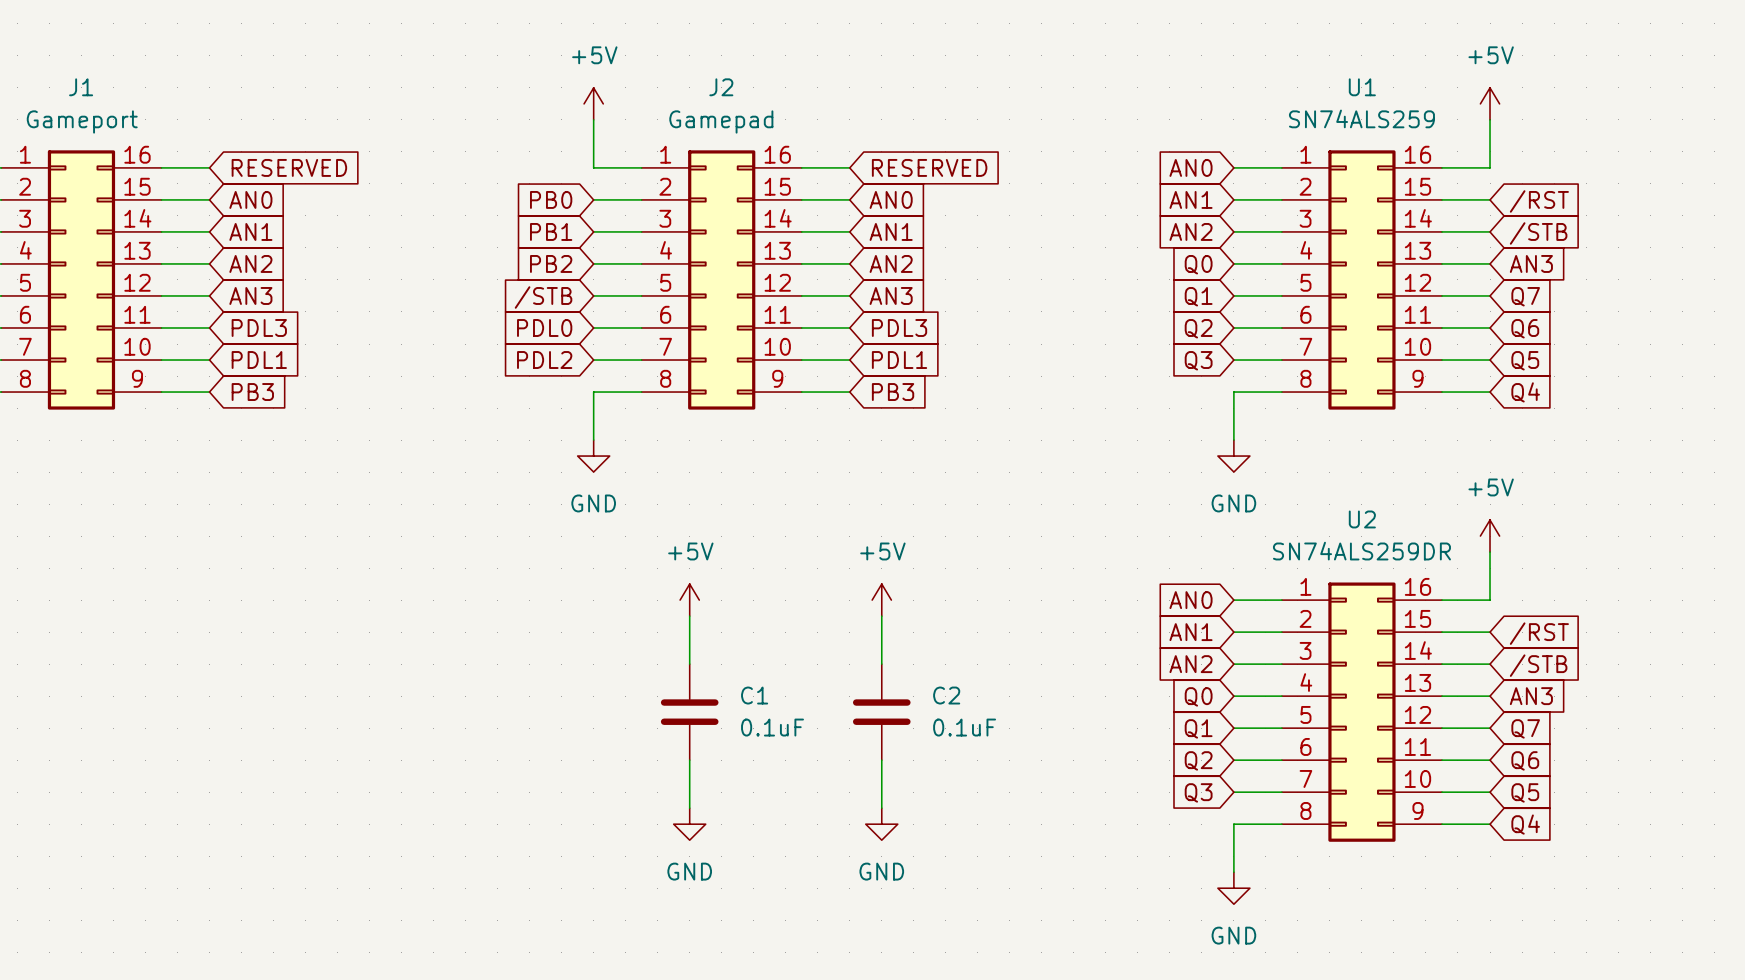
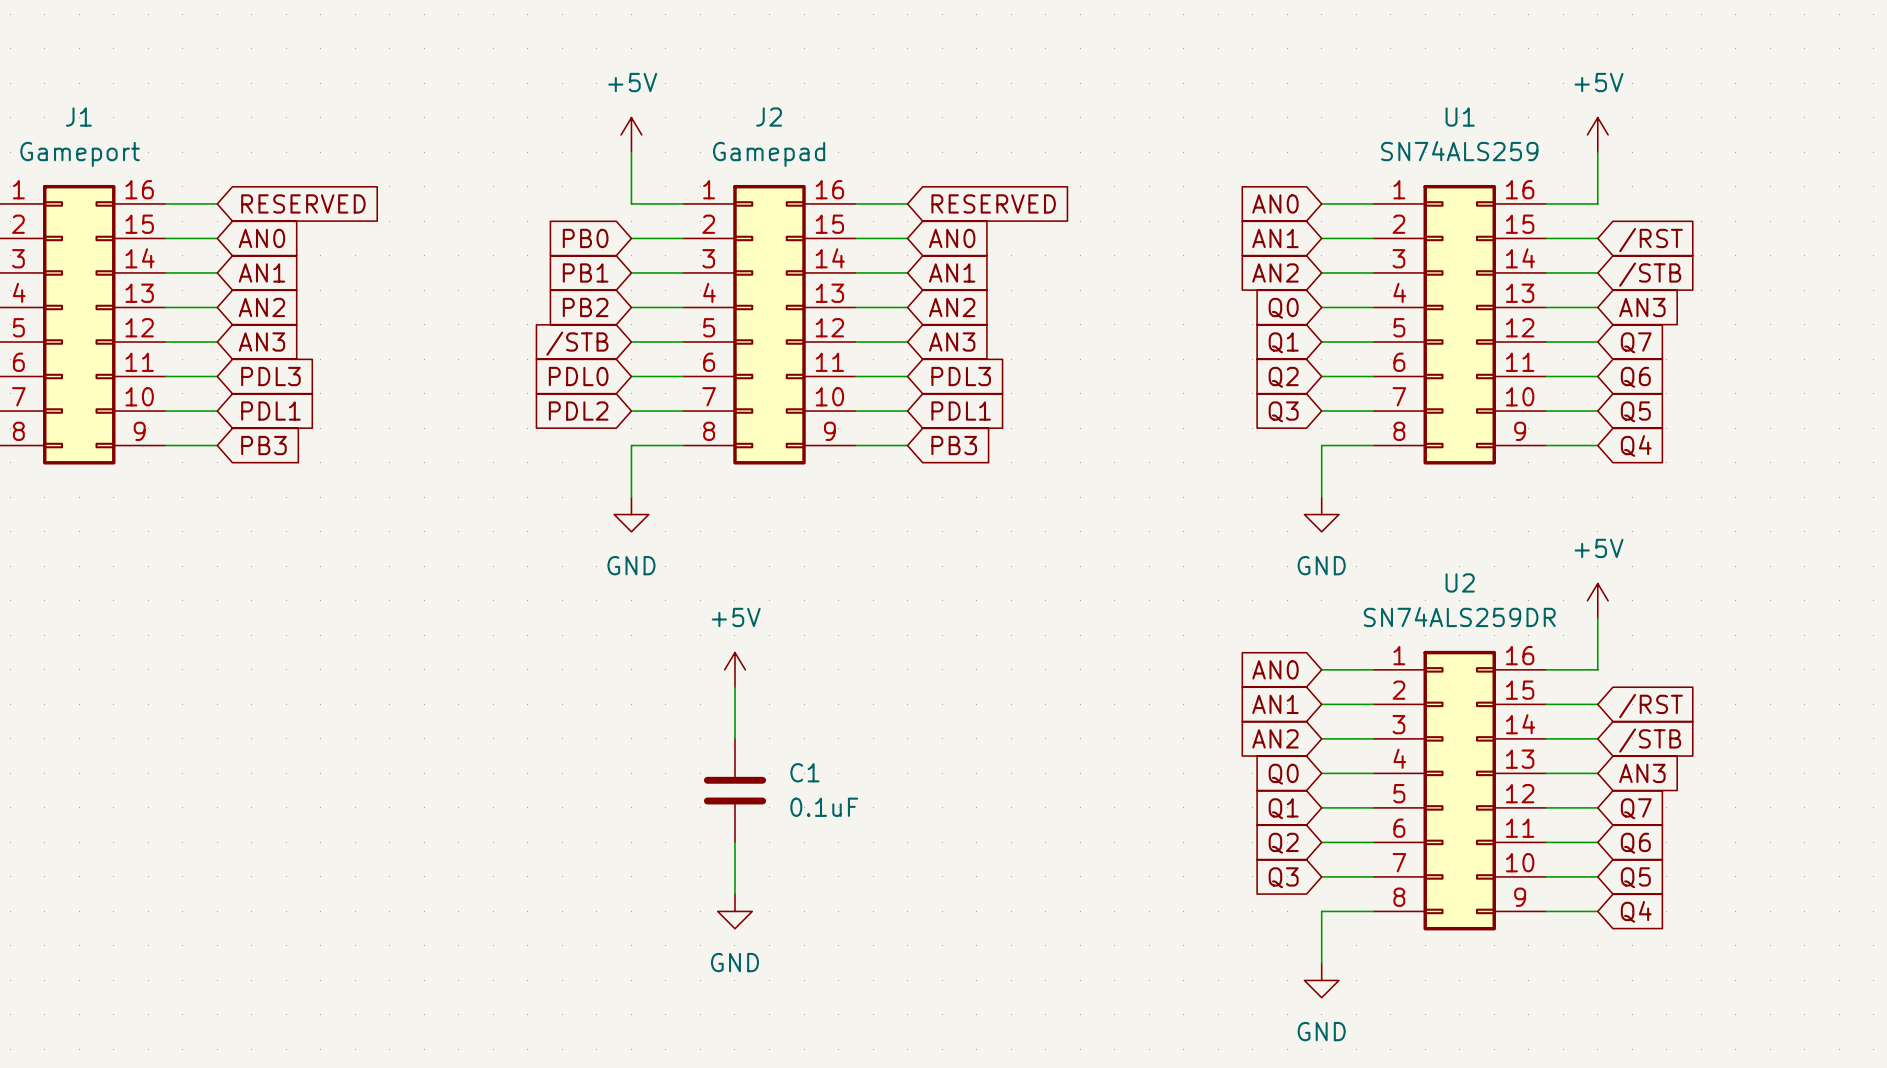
power symbol: +5V (881, 600) -> none
wire: (881, 616) (881, 664) -> none
C2: 0.1uF (881, 712) -> none
wire: (881, 760) (881, 808) -> none
power symbol: GND (881, 824) -> none

